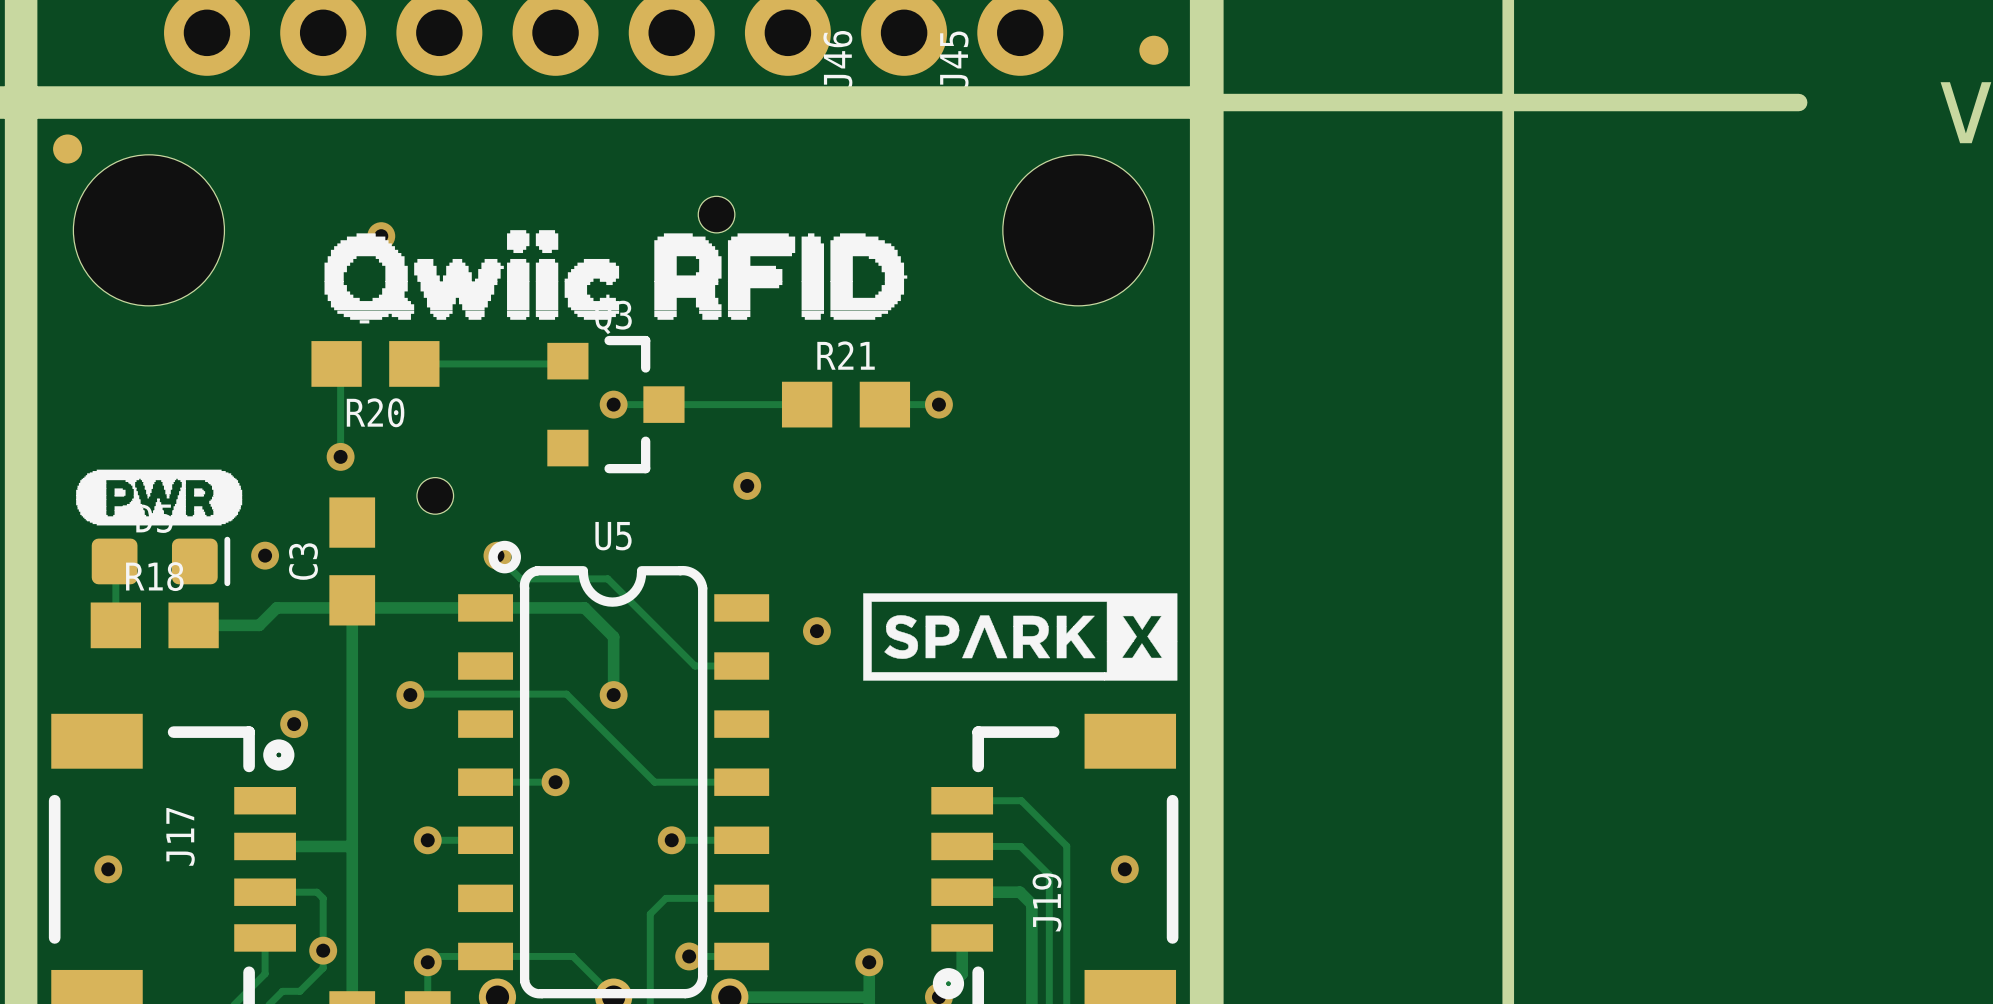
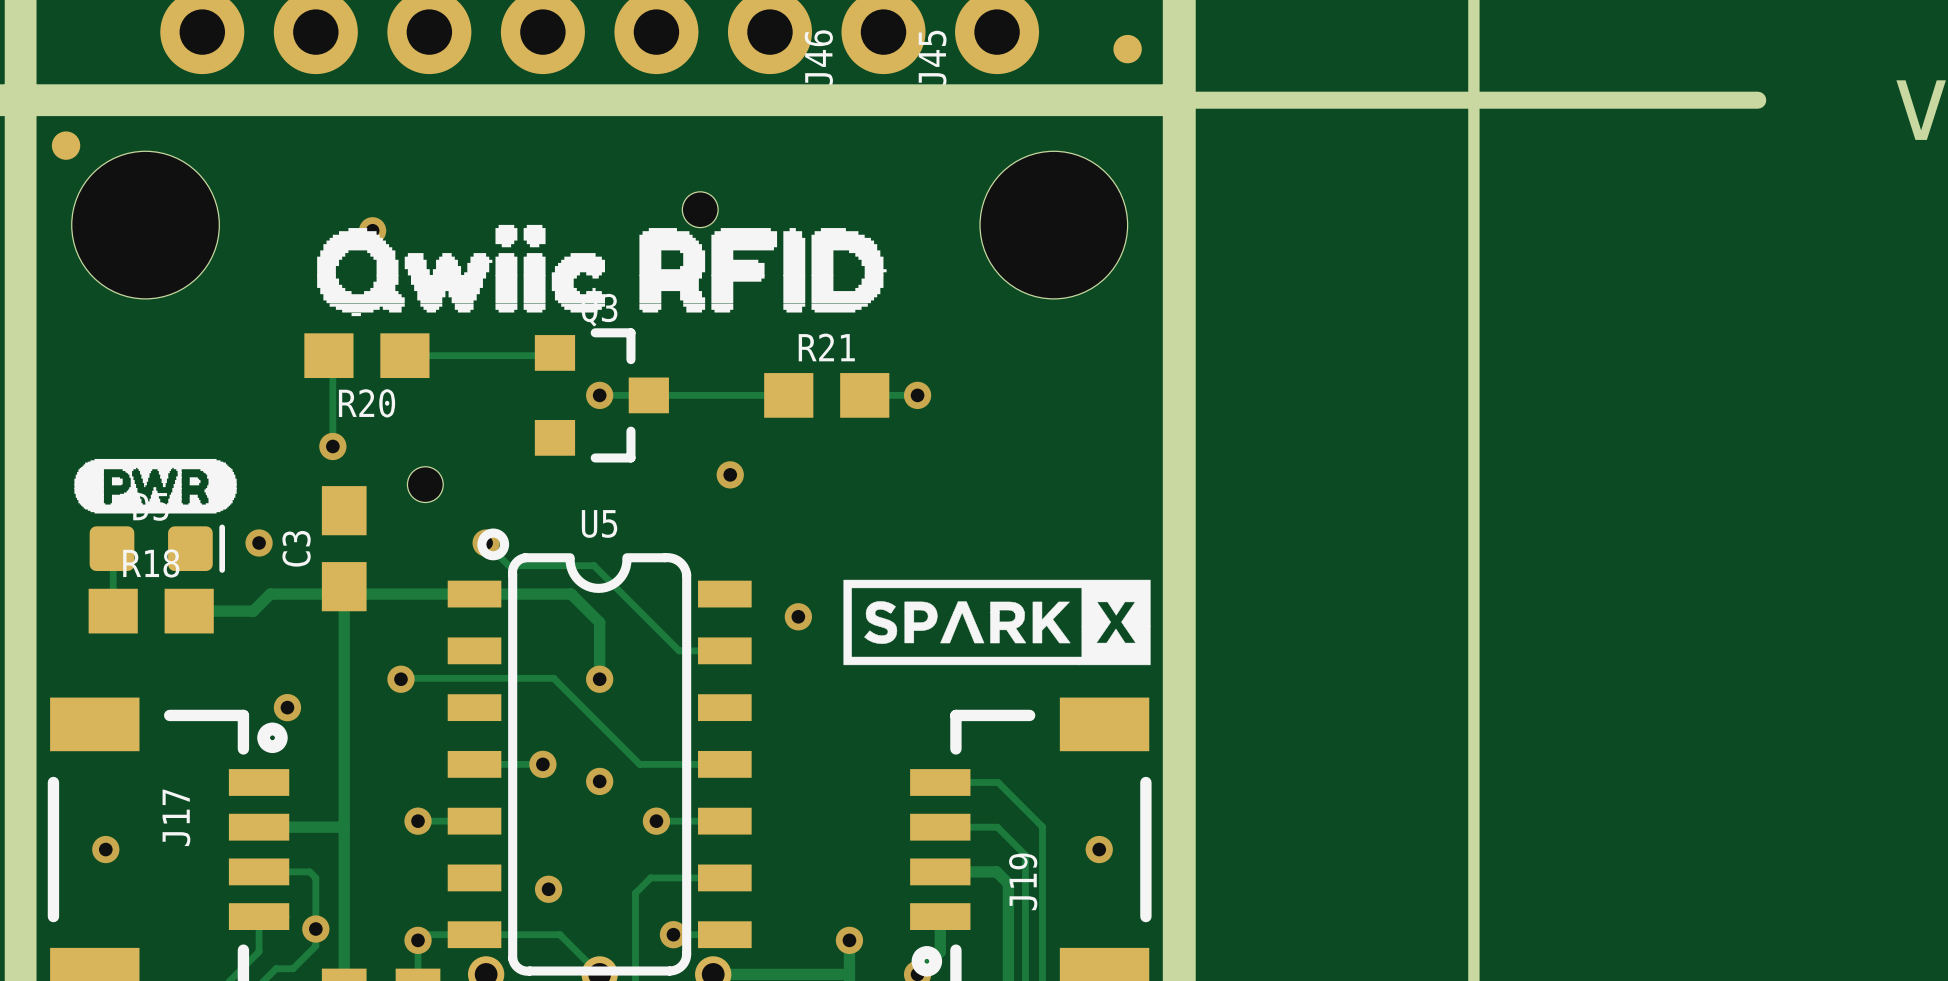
via: none -> (599, 781)
via: none -> (548, 889)

